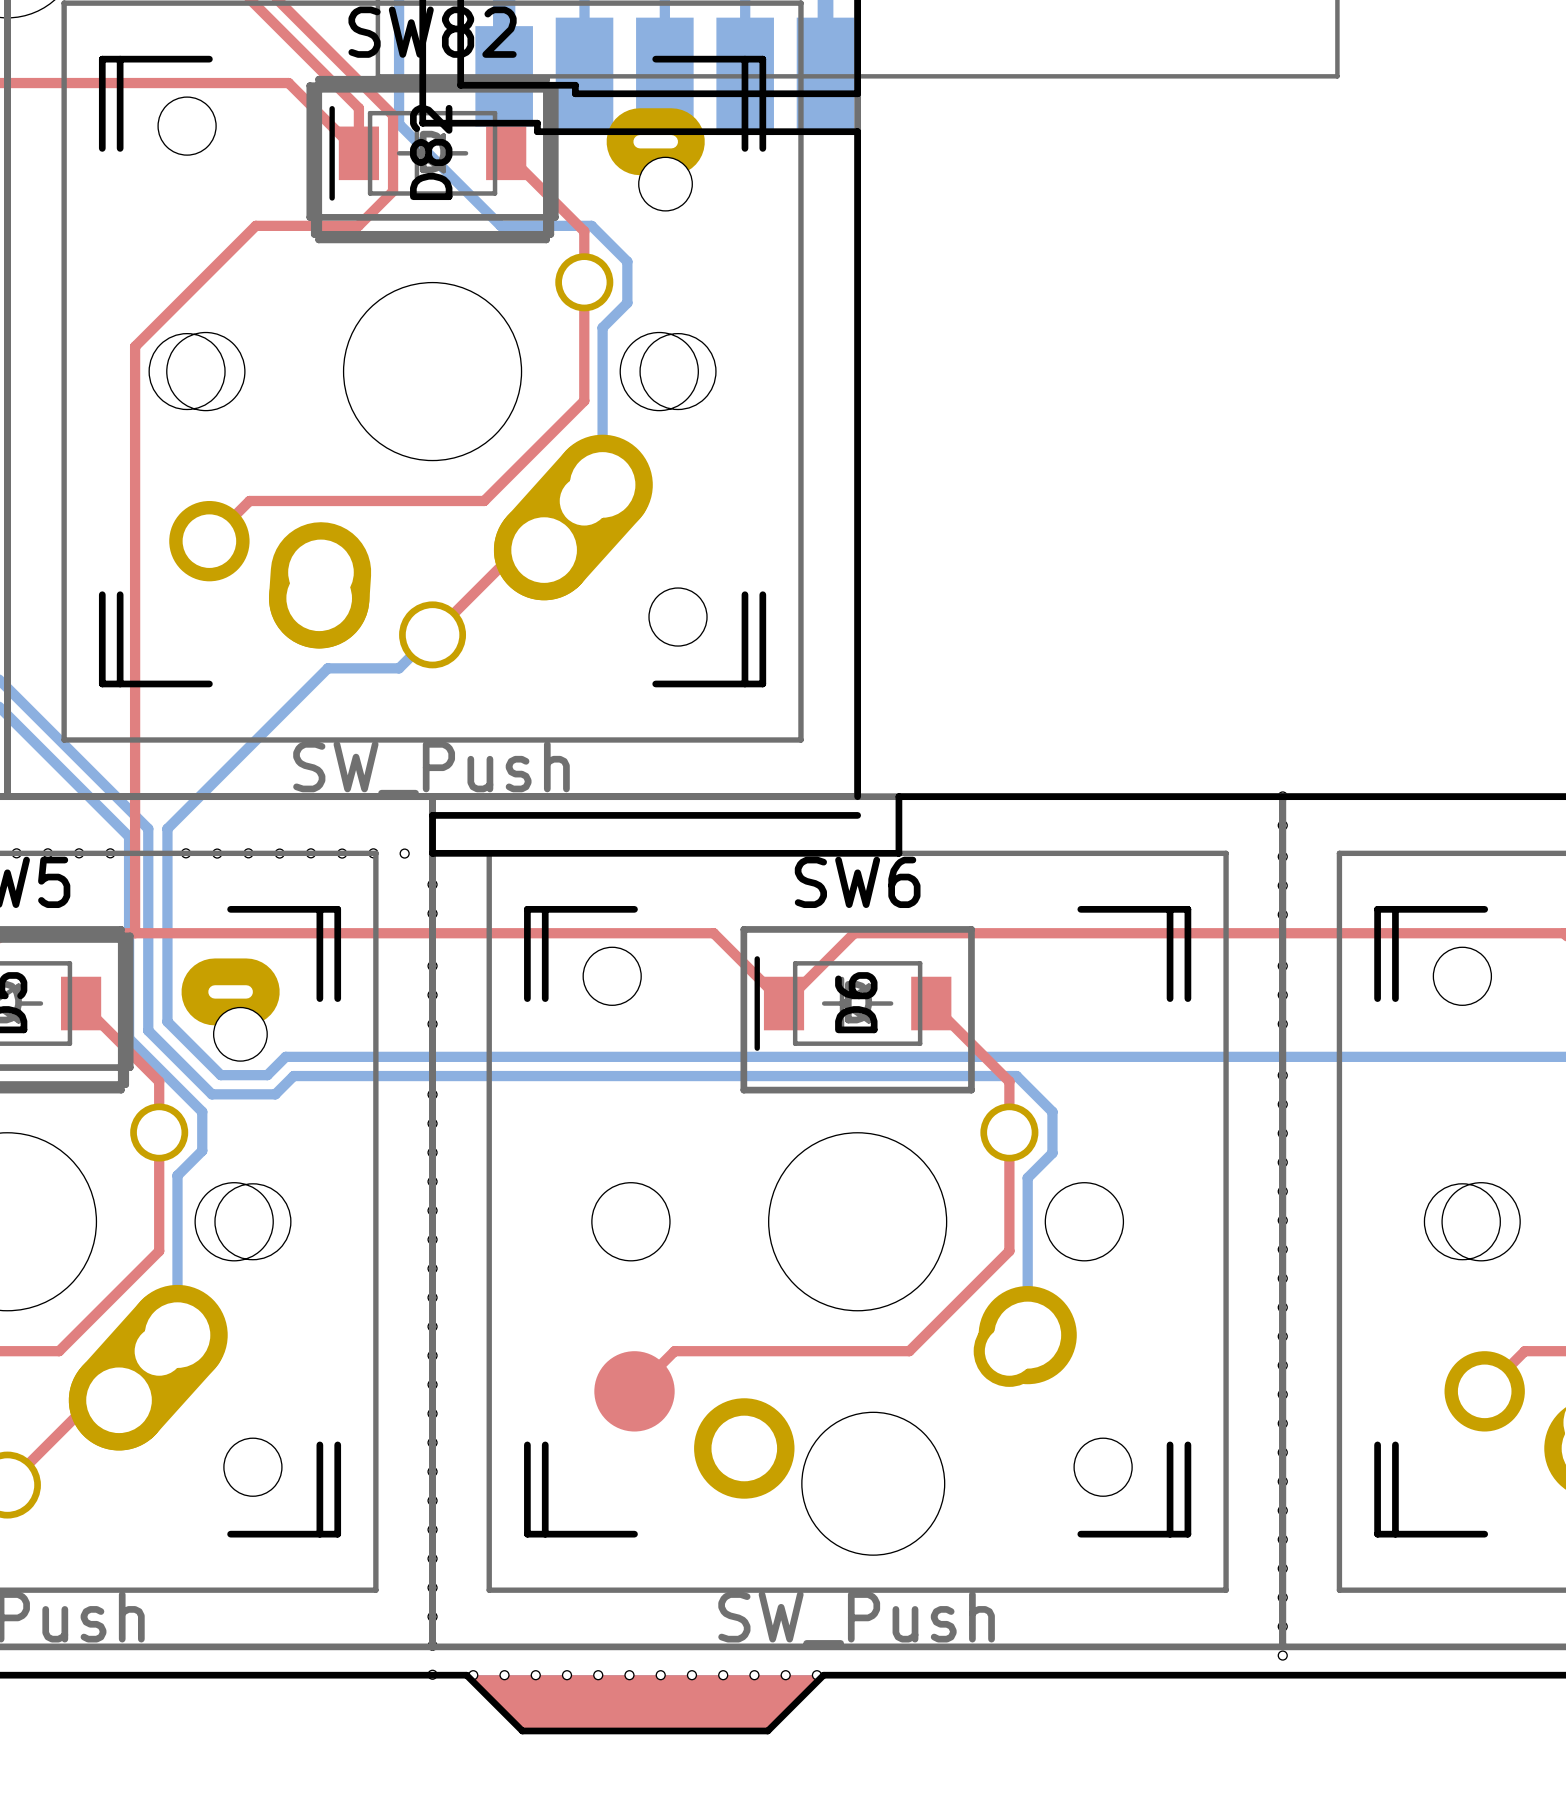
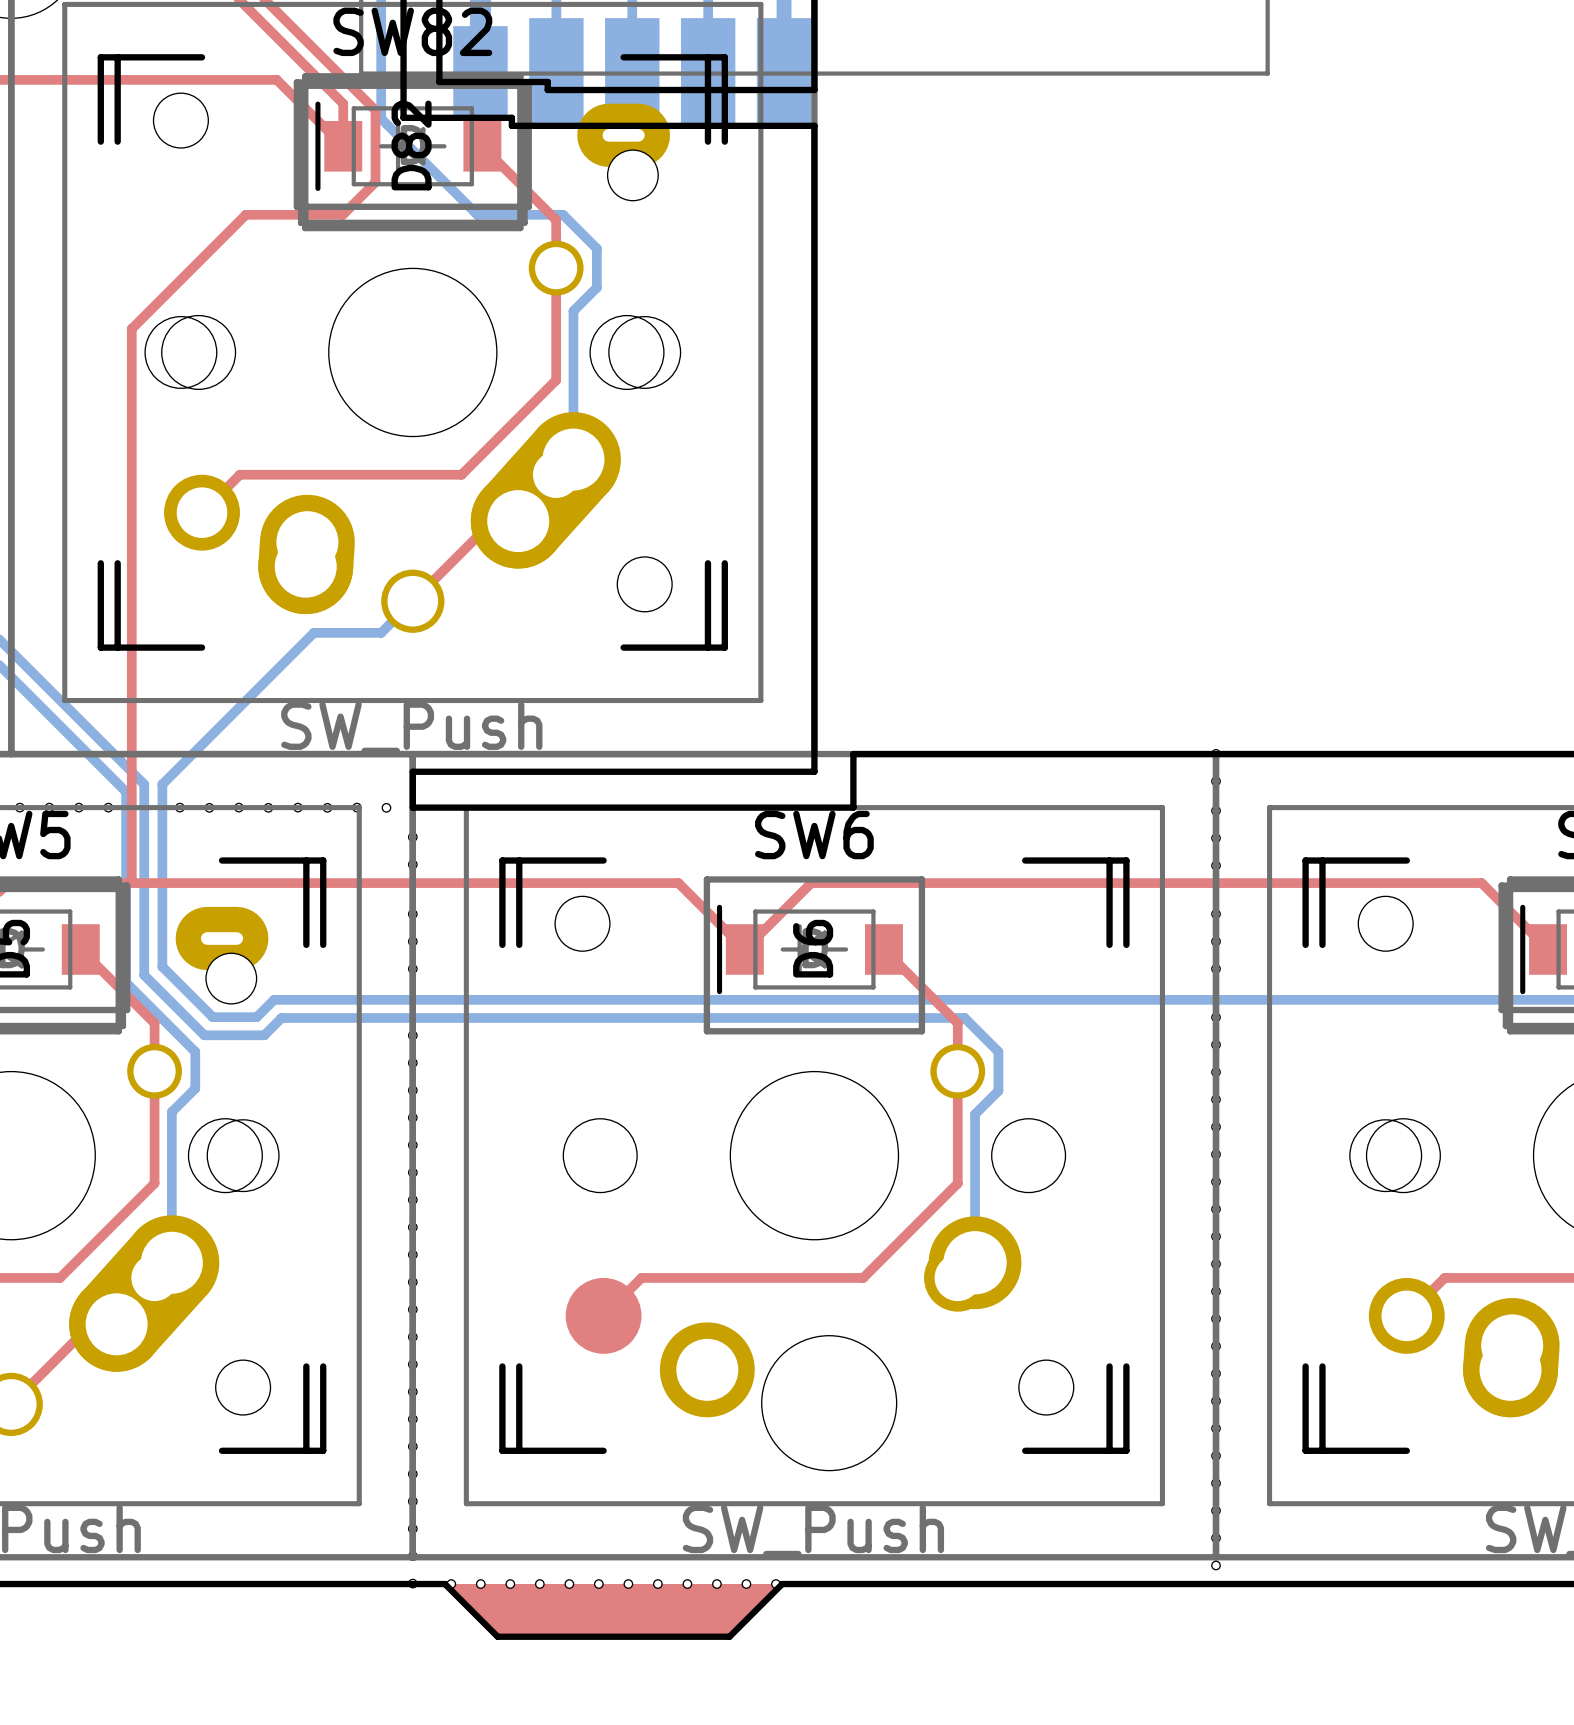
board edge: none -> (814, 754) (814, 771)

